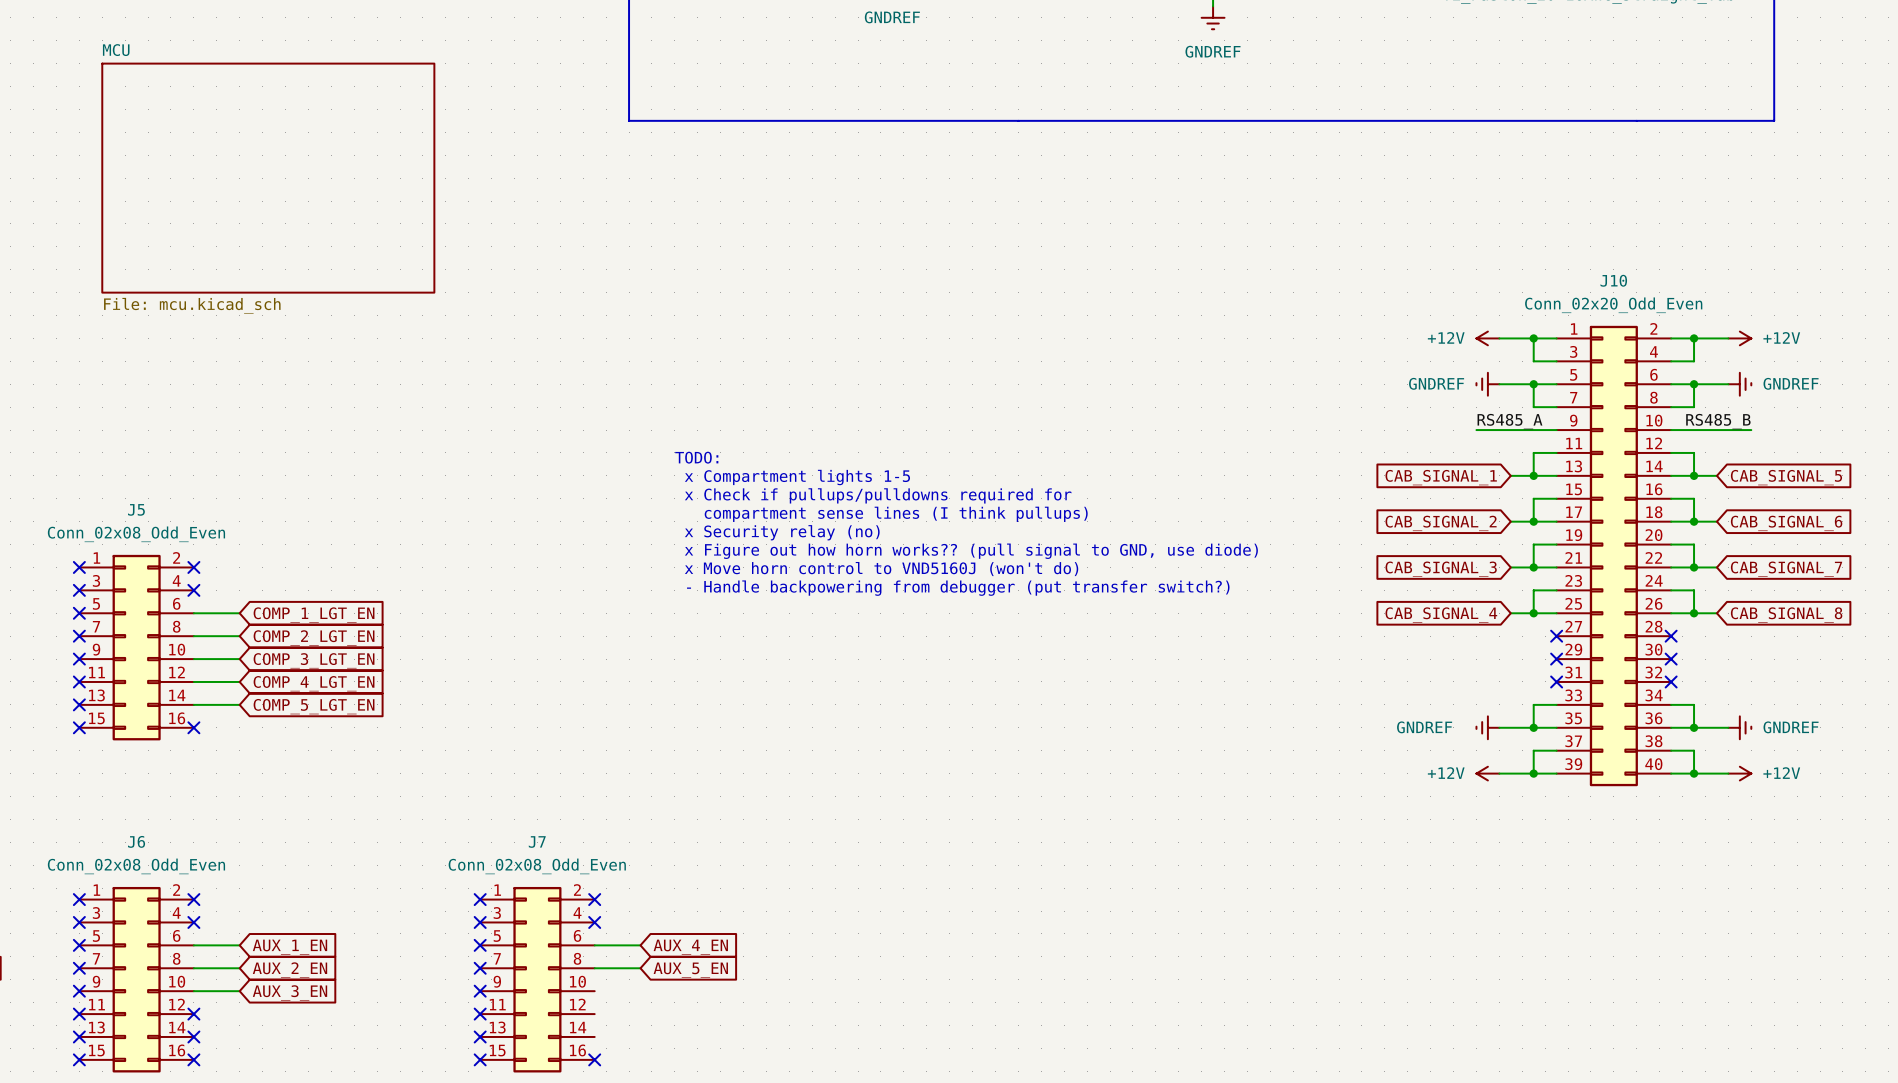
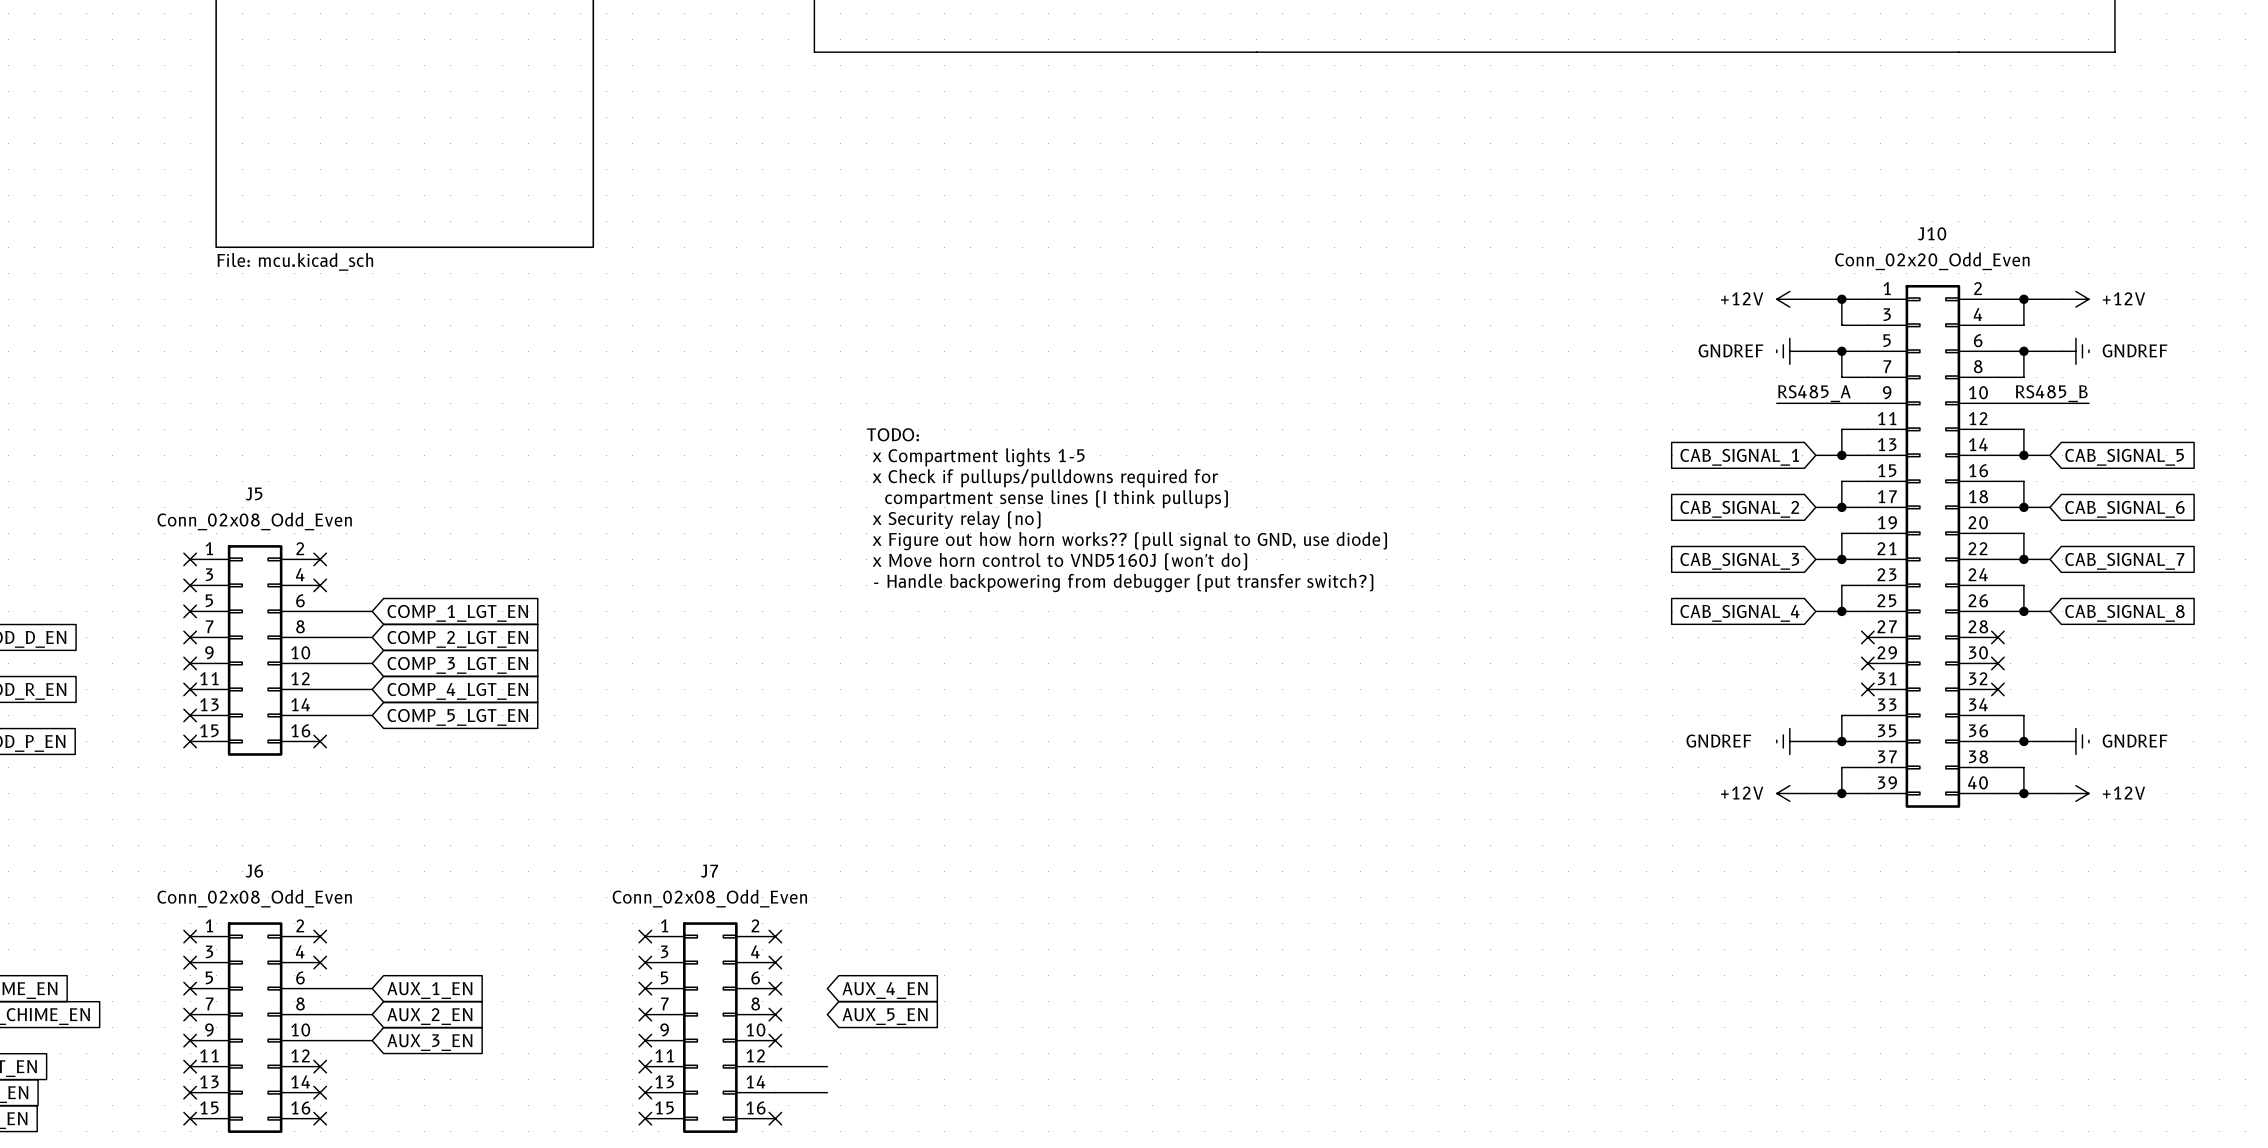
wire: (594, 945) (640, 945) -> (775, 1066) (827, 1066)
no-connect mark: none -> (775, 988)
wire: (594, 968) (640, 968) -> (775, 1092) (827, 1092)
no-connect mark: none -> (775, 1014)
no-connect mark: none -> (775, 1040)

